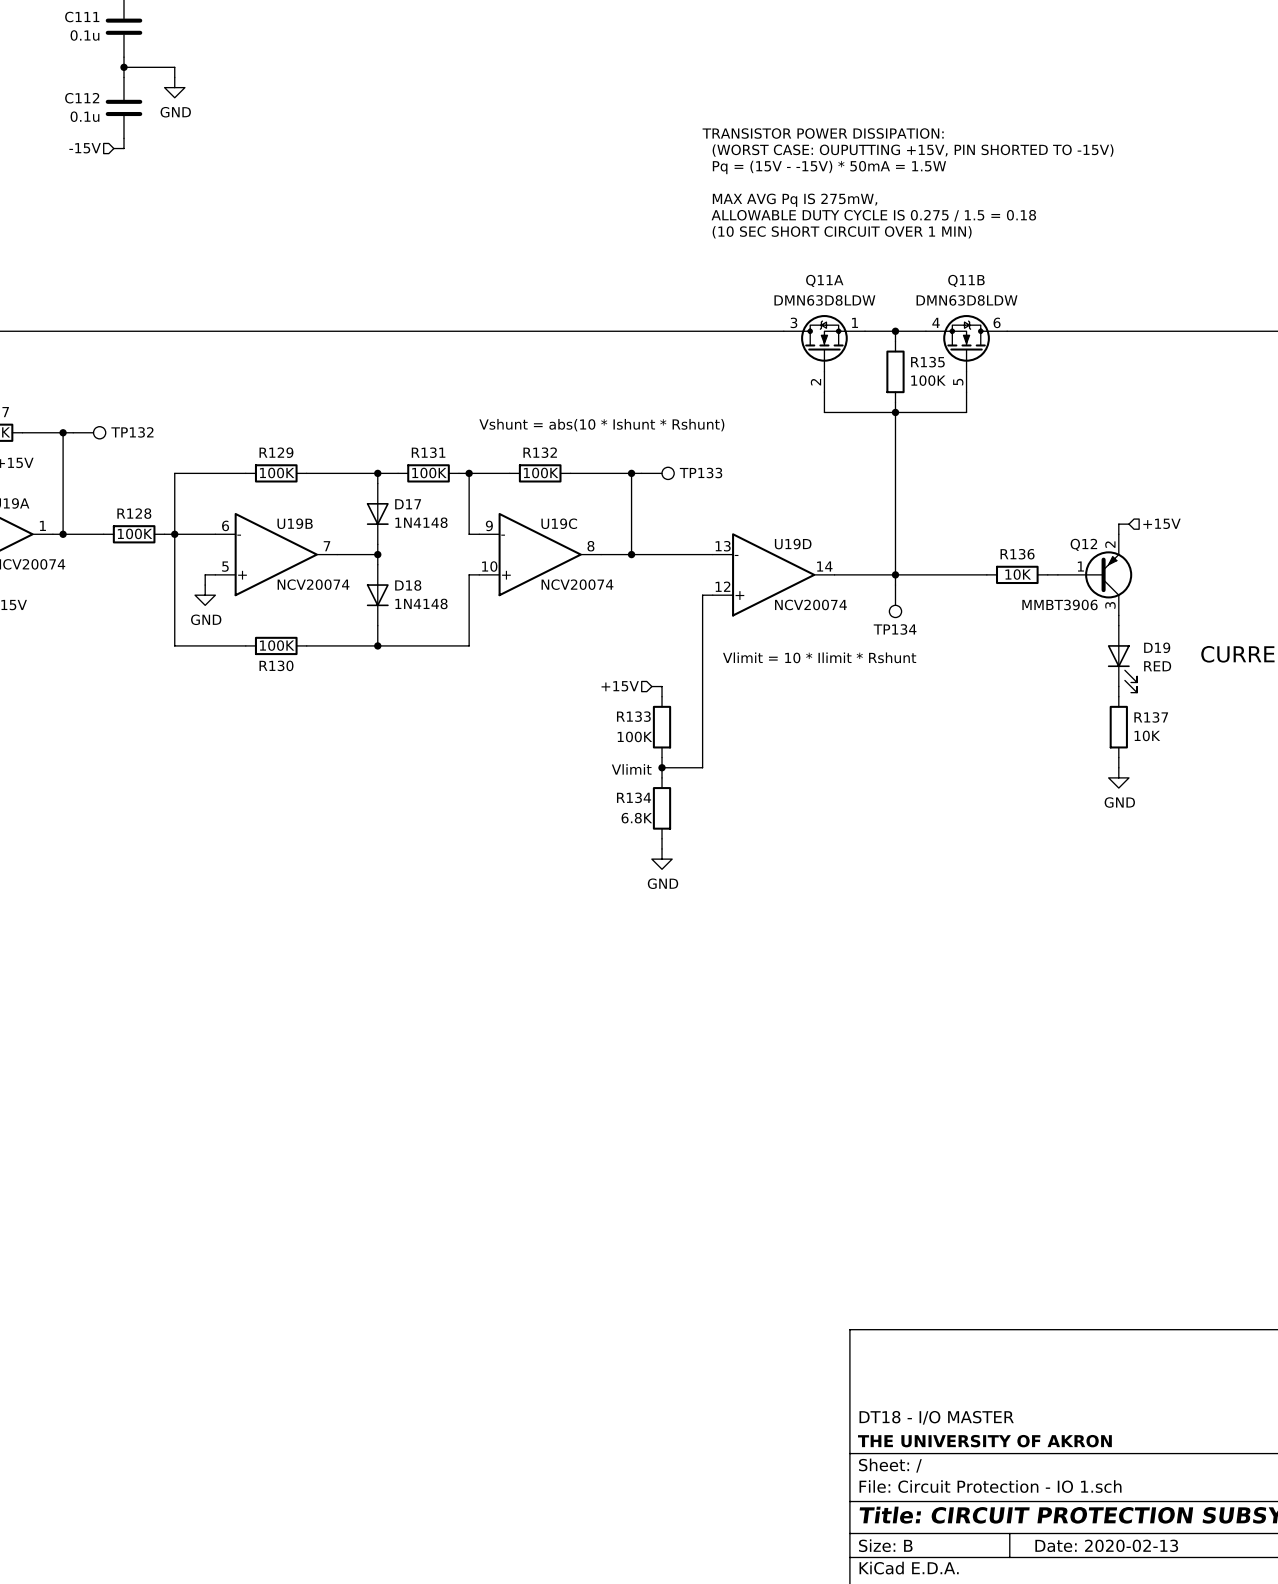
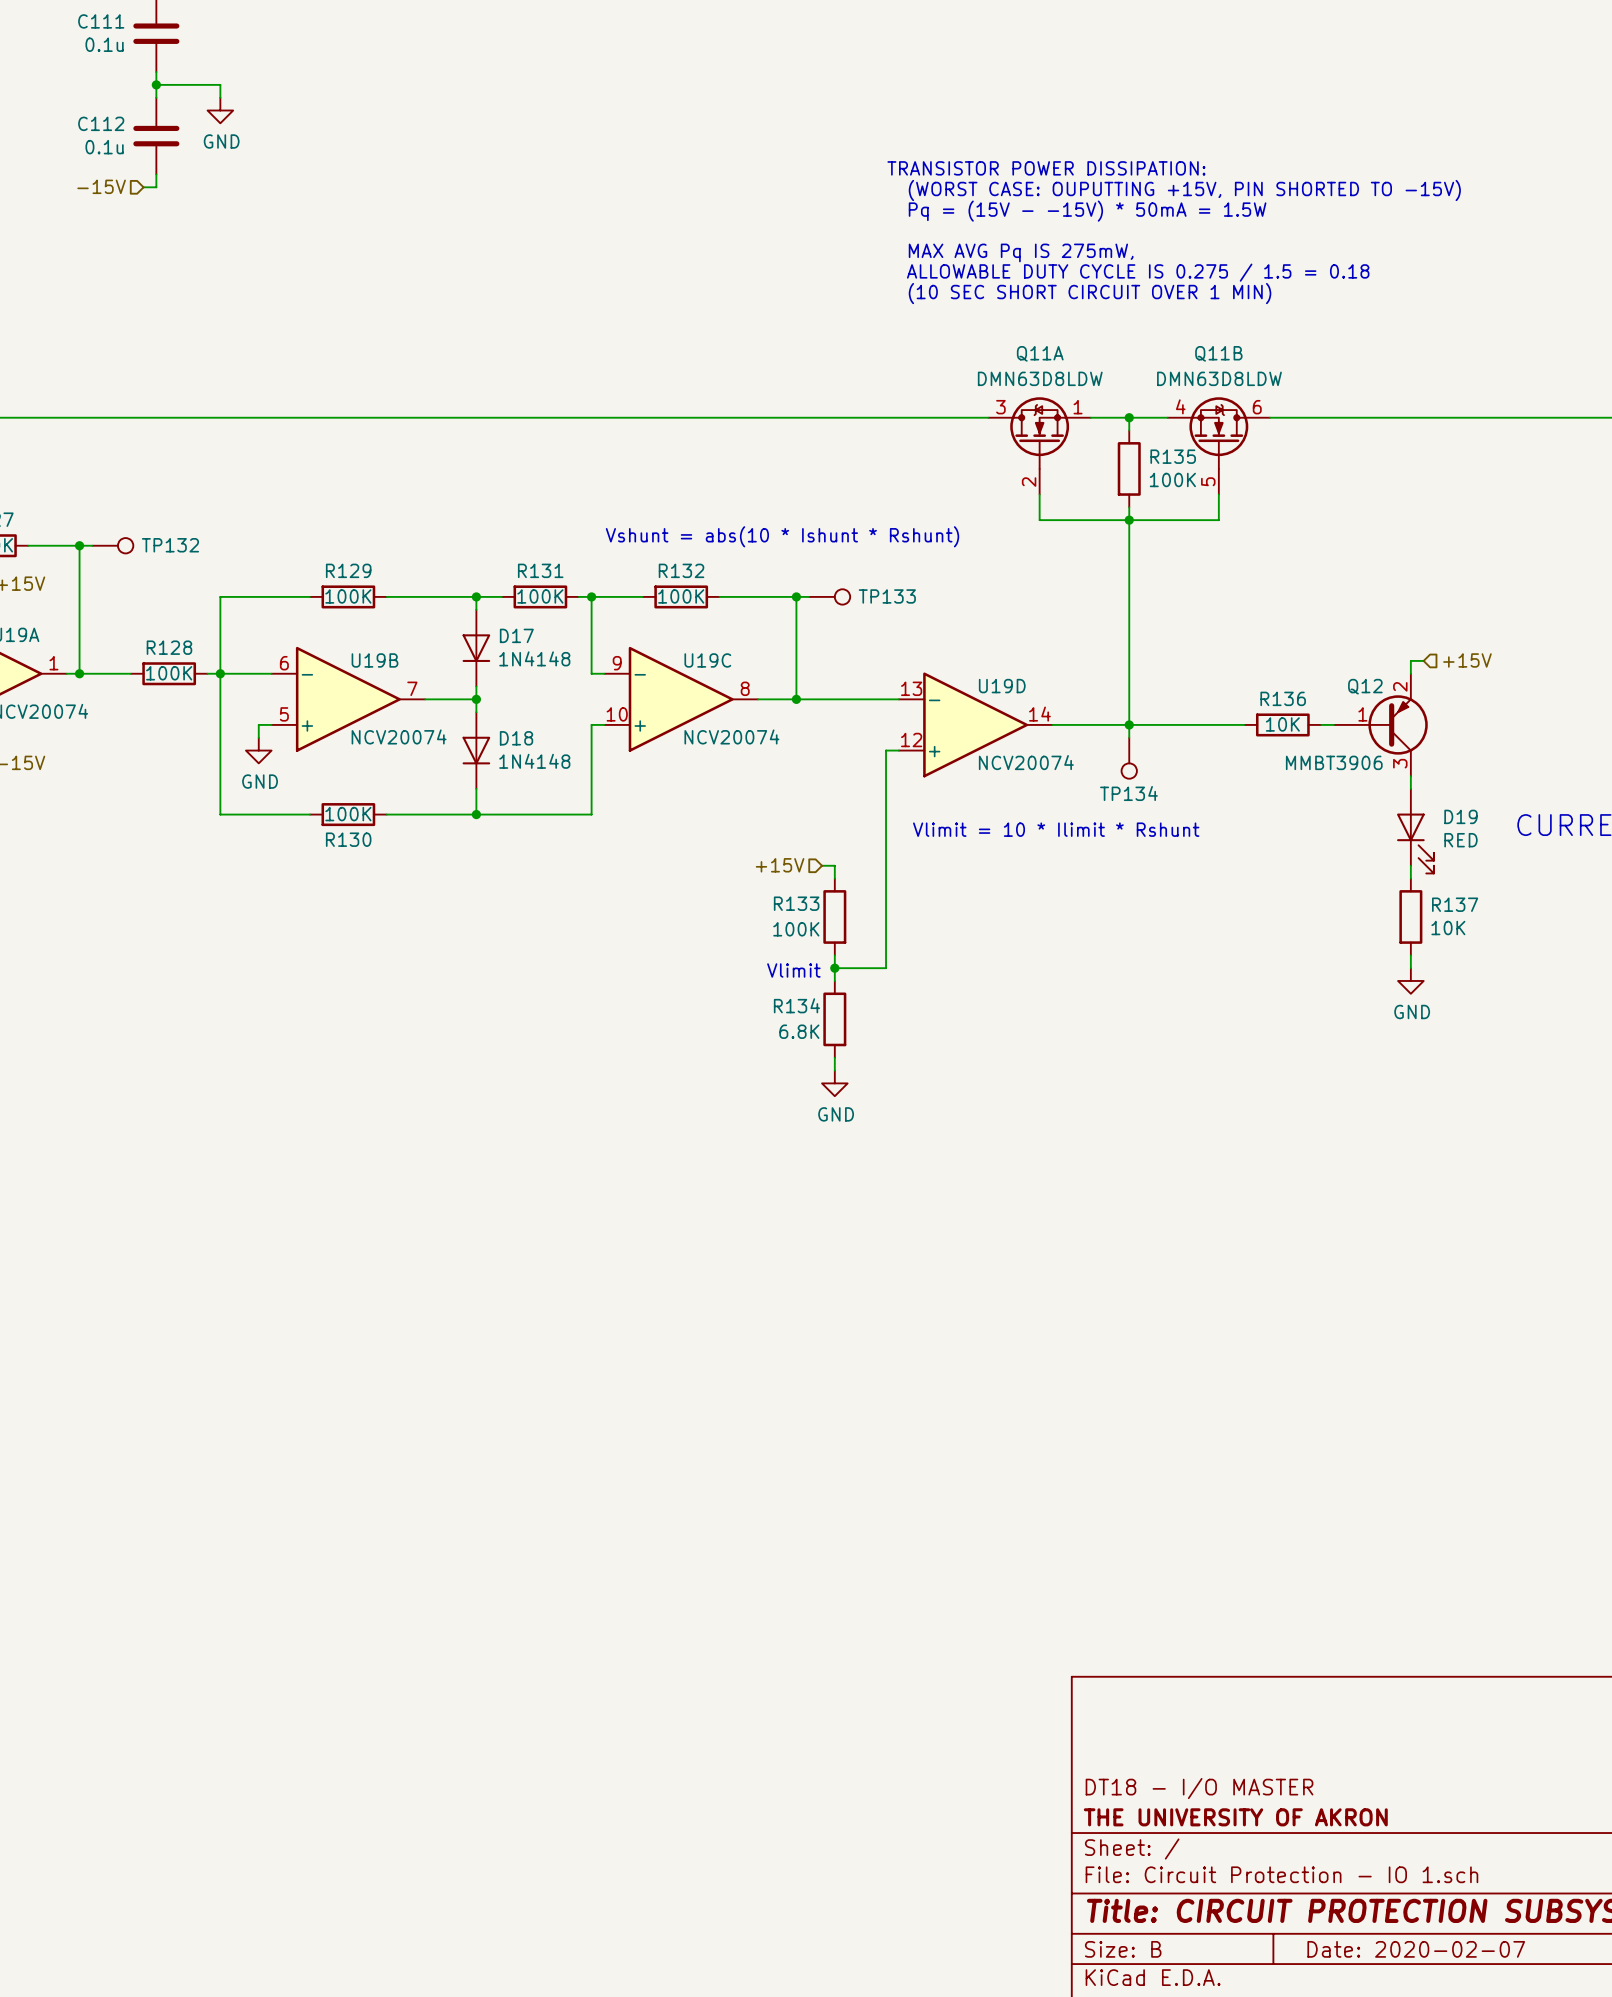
title block: Date: 2020-02-13 (1106, 1545) -> Date: 2020-02-07 (1416, 1949)

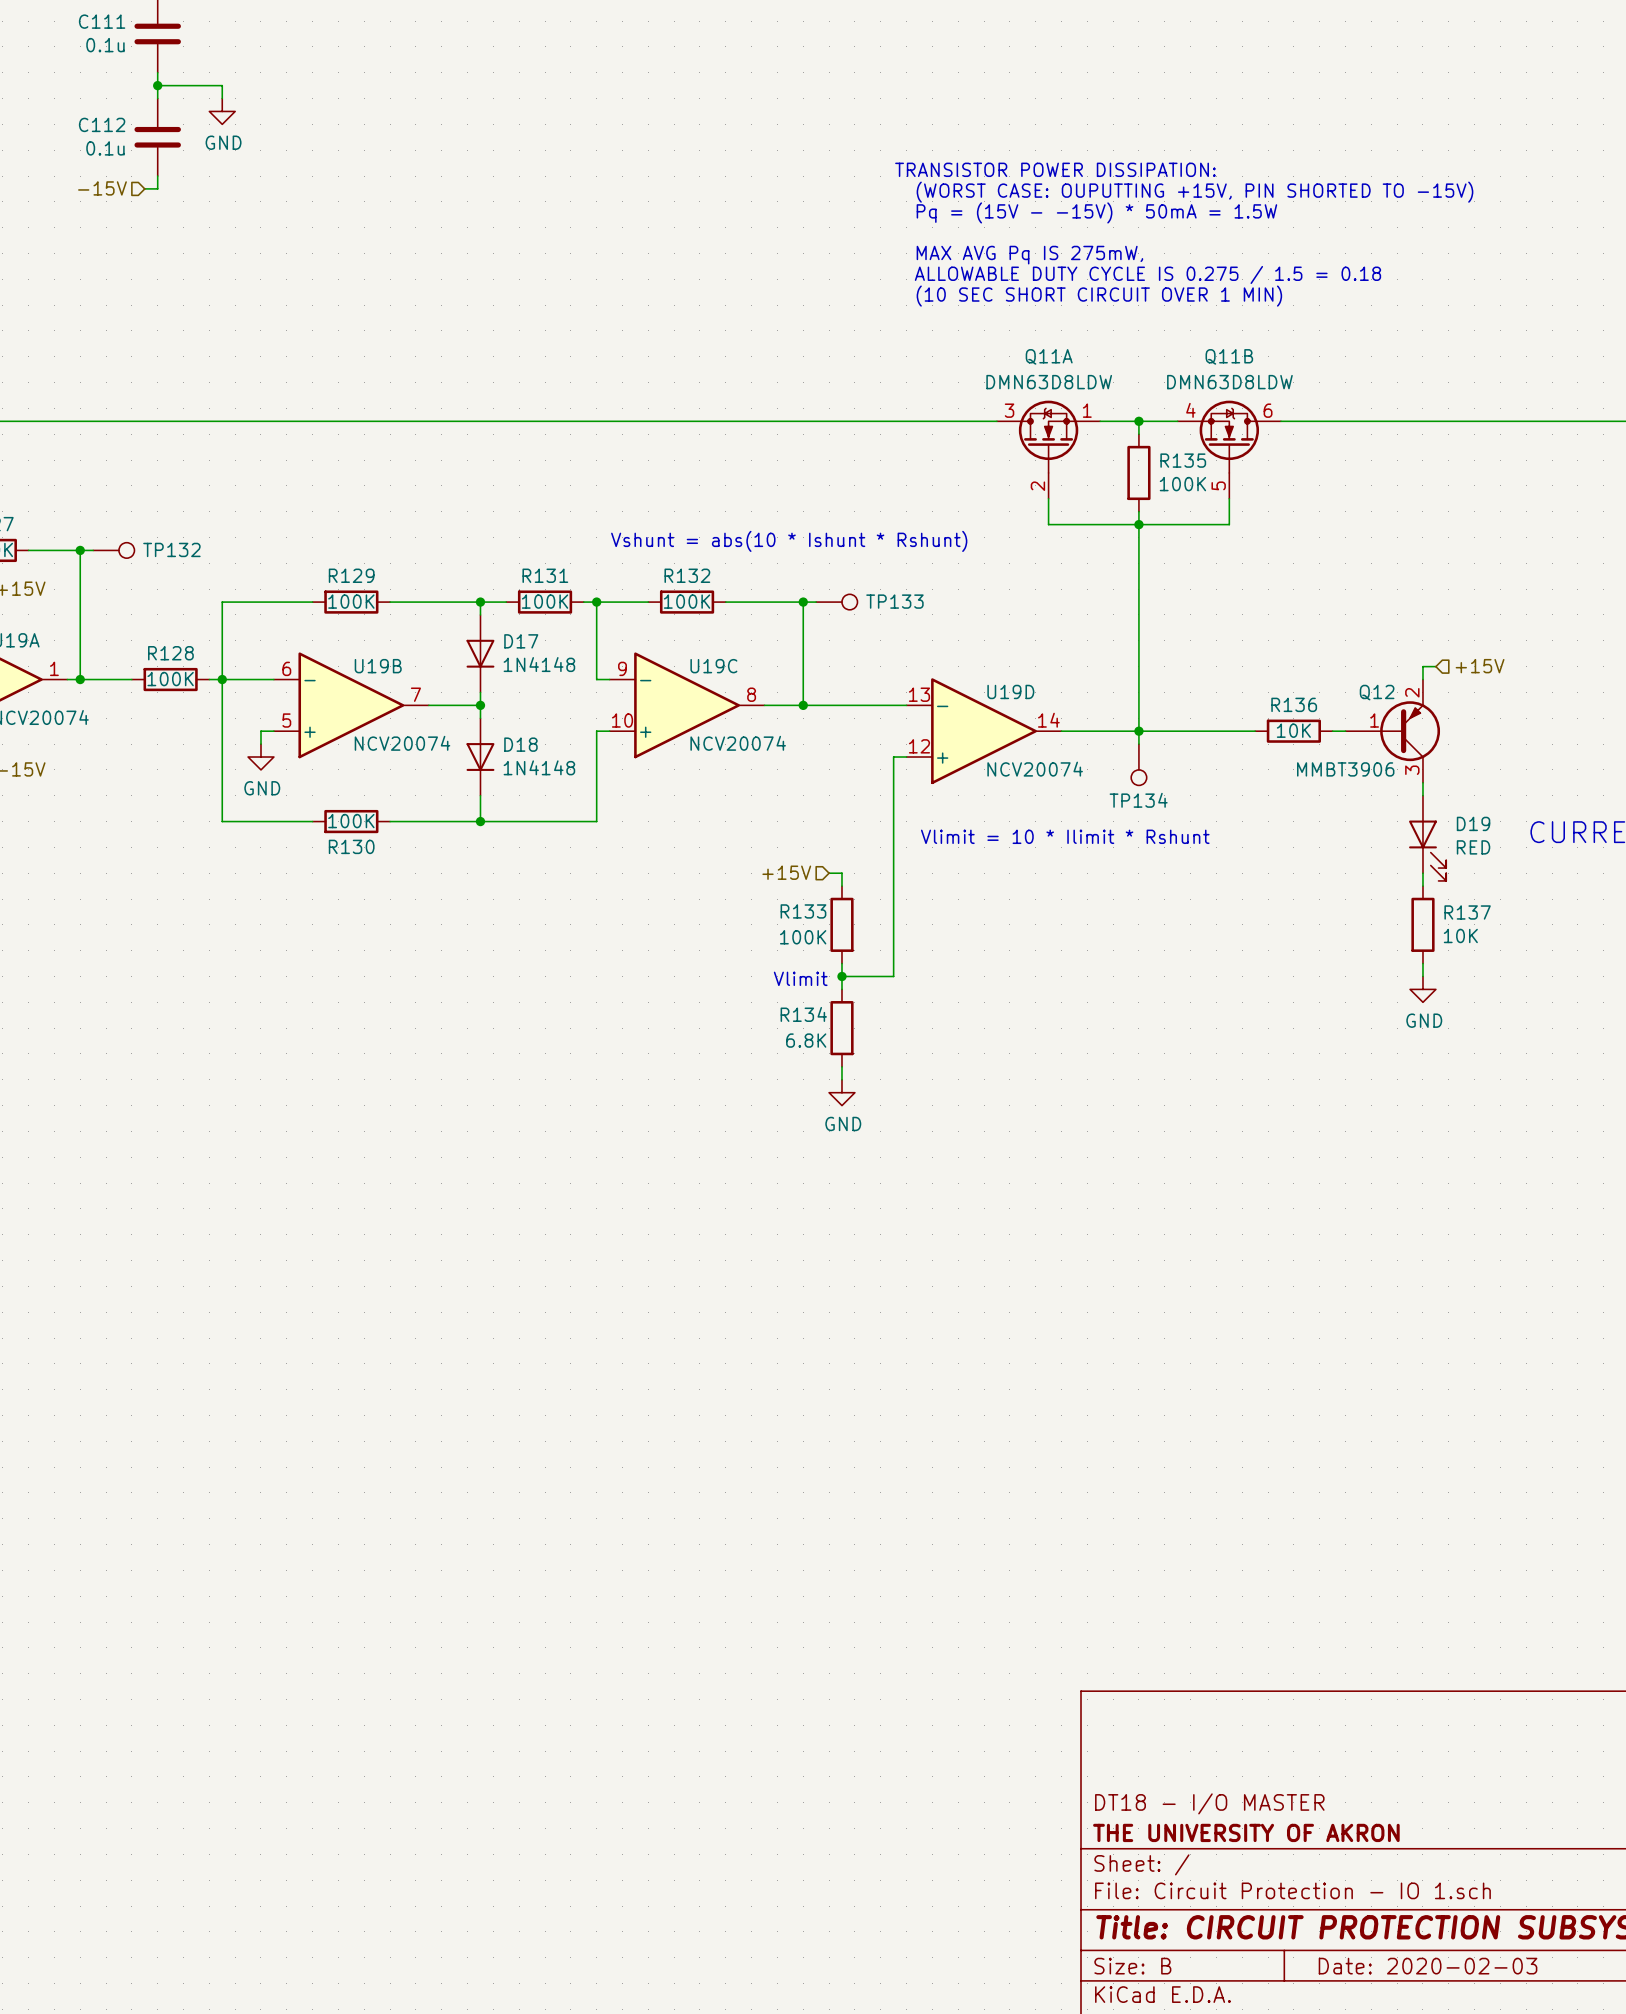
title block: Date: 2020-02-07 (1416, 1949) -> Date: 2020-02-03 (1428, 1966)

